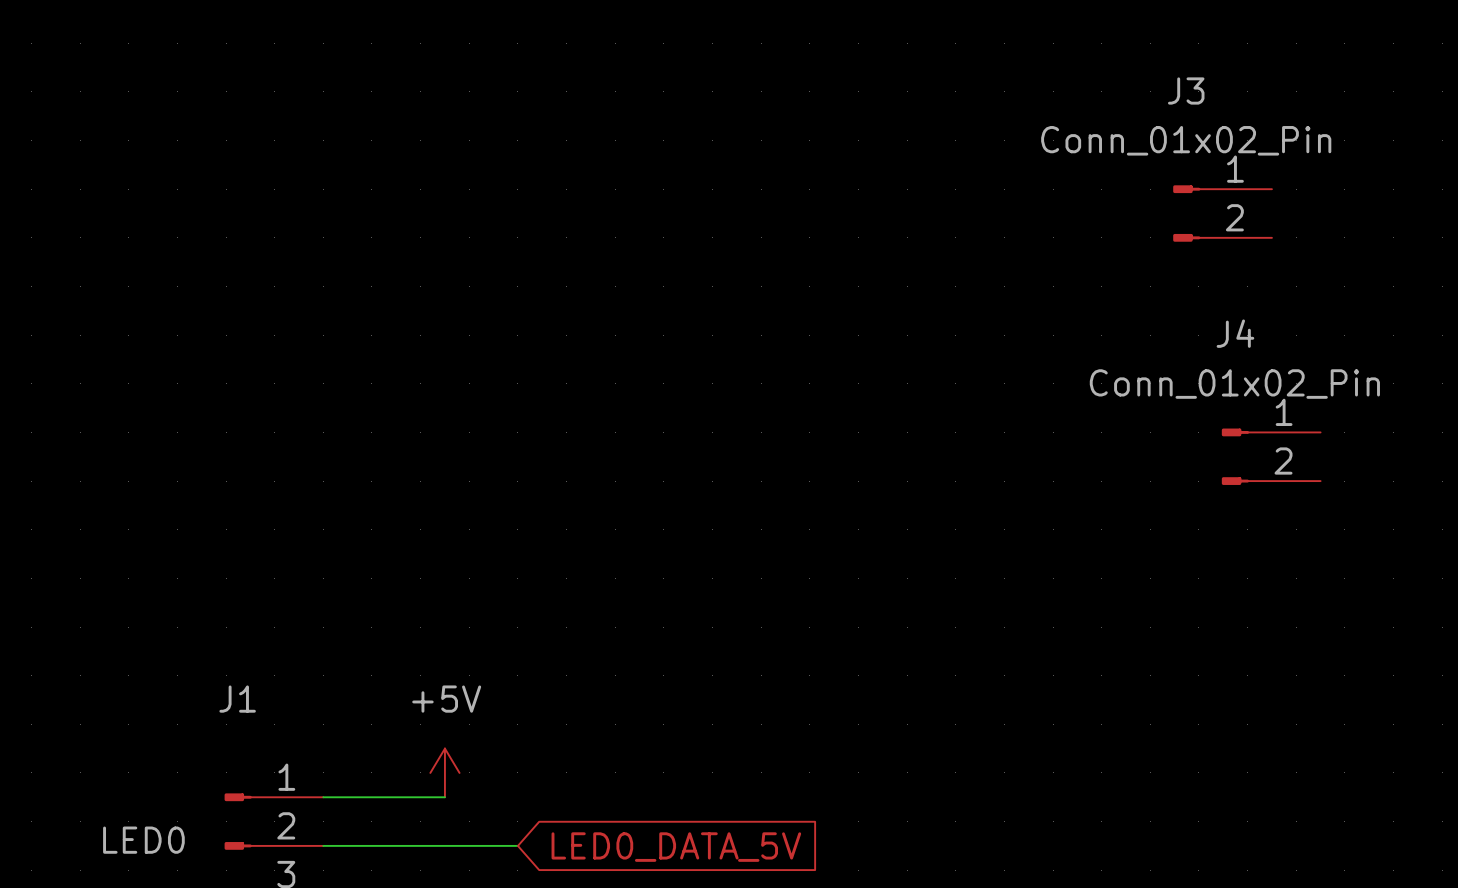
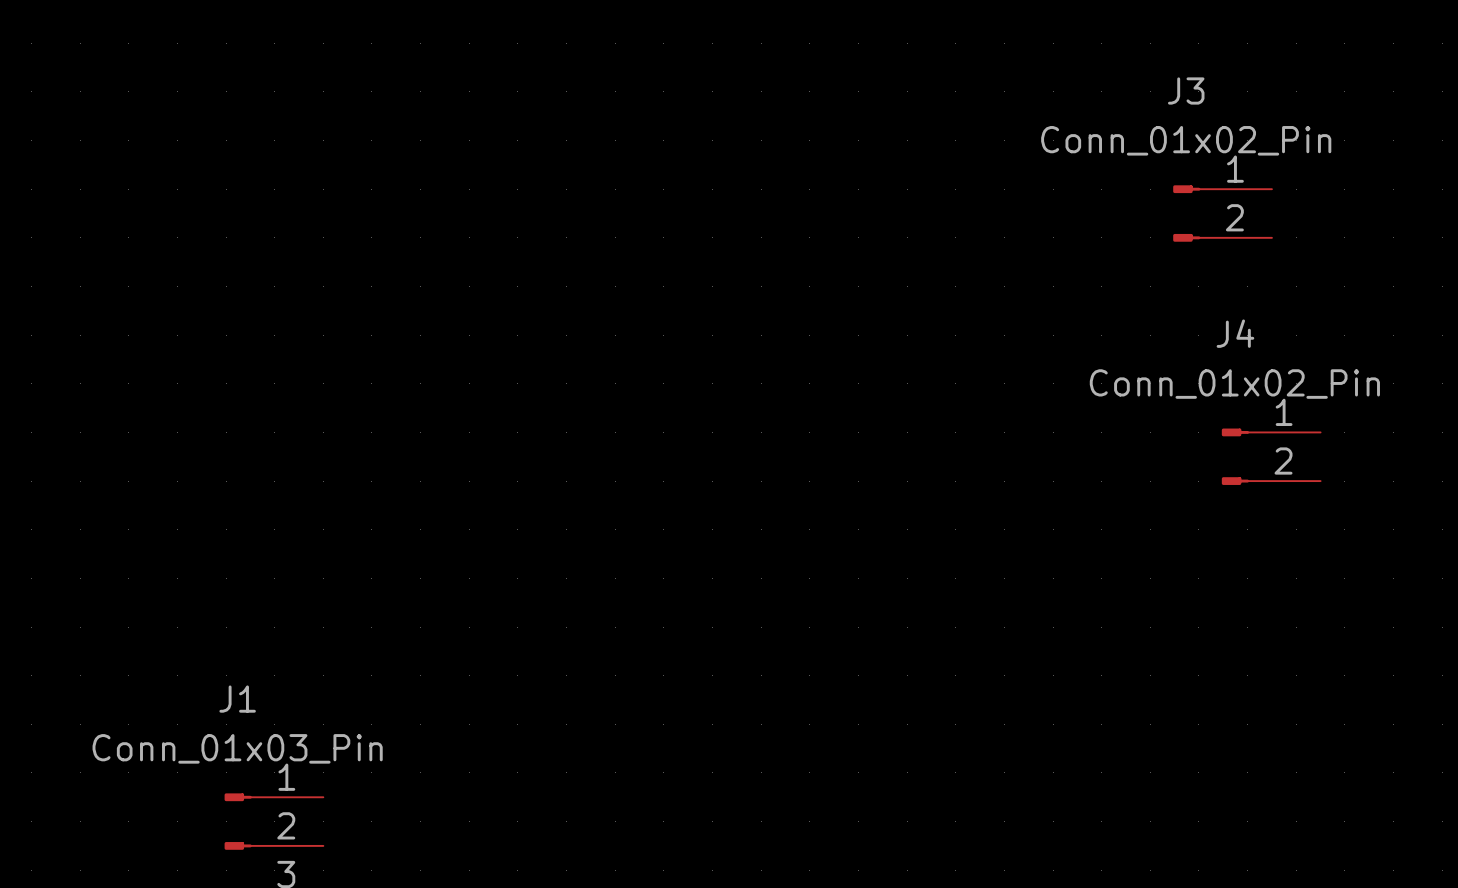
power symbol: +5V (444, 772) -> none
wire: (323, 797) (444, 797) -> none
J1 value: LED0 (143, 840) -> Conn_01x03_Pin (237, 748)
wire: (323, 845) (517, 845) -> none
global label: LED0_DATA_5V (676, 847) -> none

